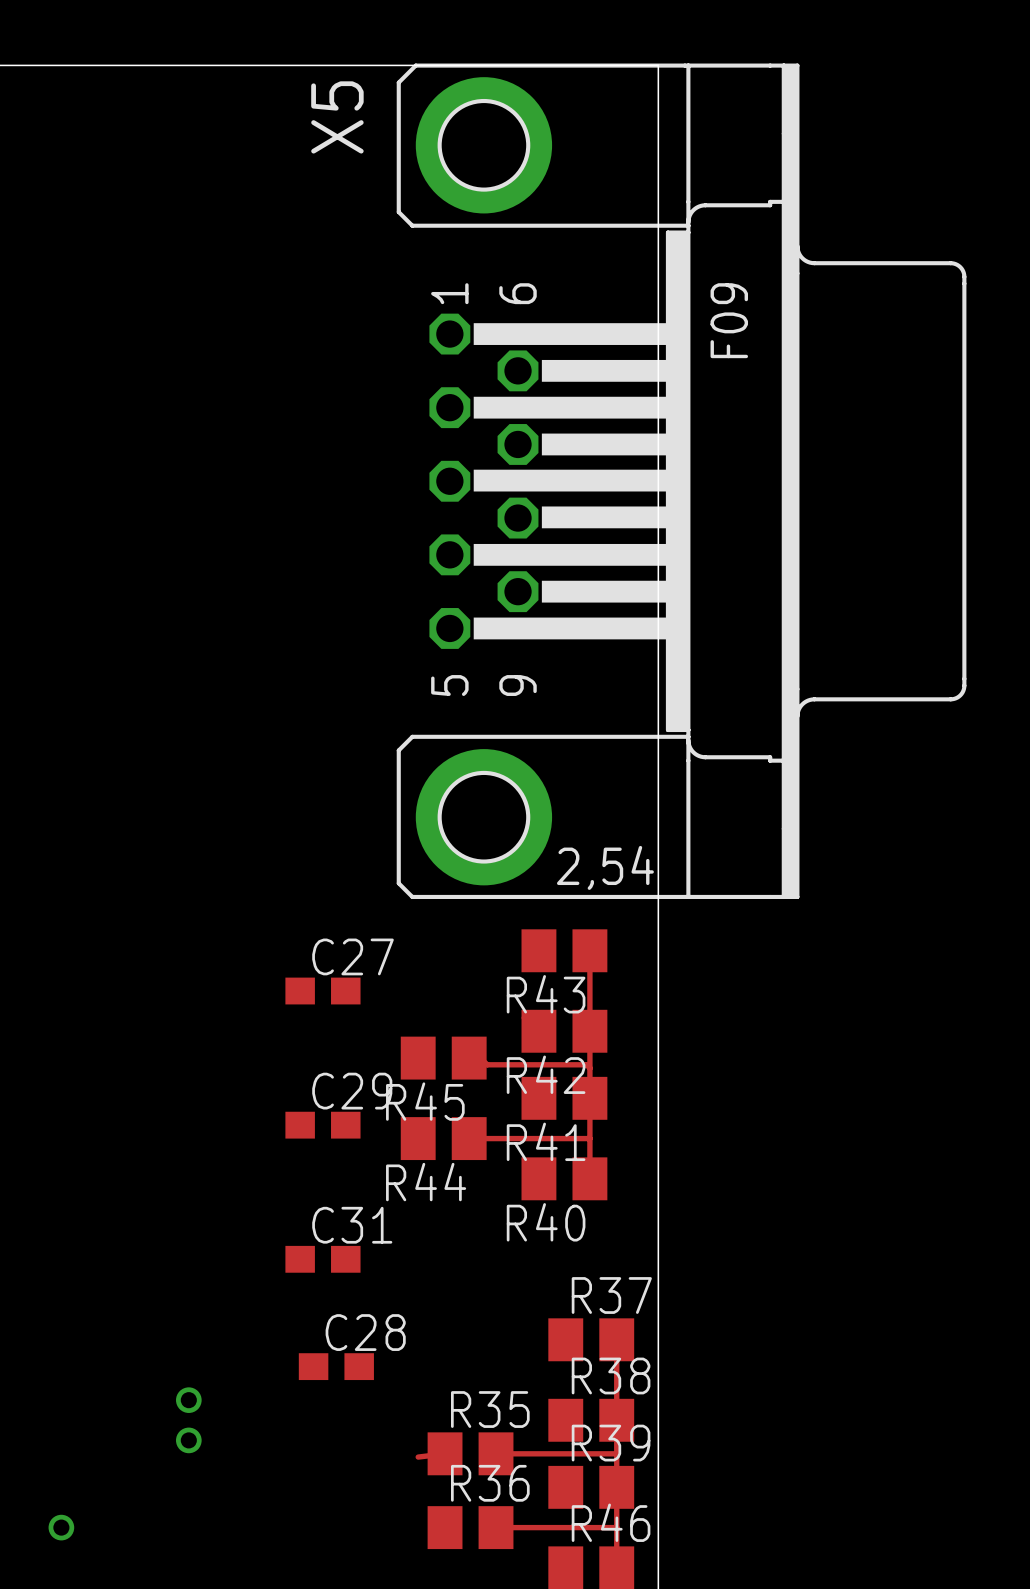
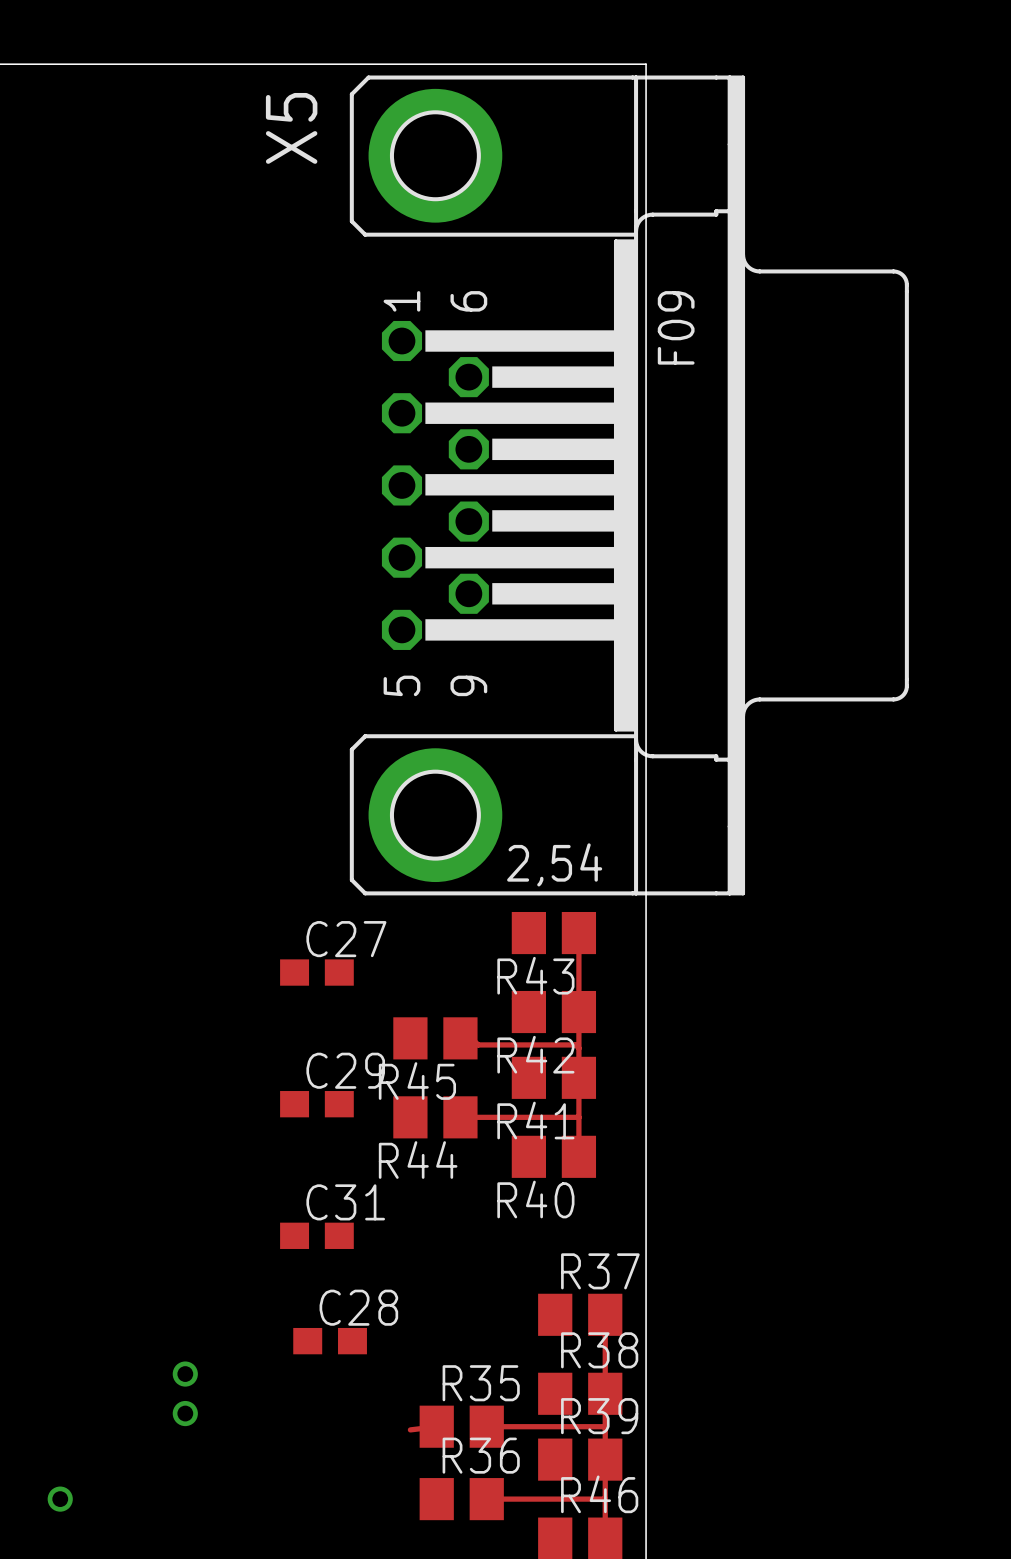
X5 position: (681, 481) -> (629, 485)

